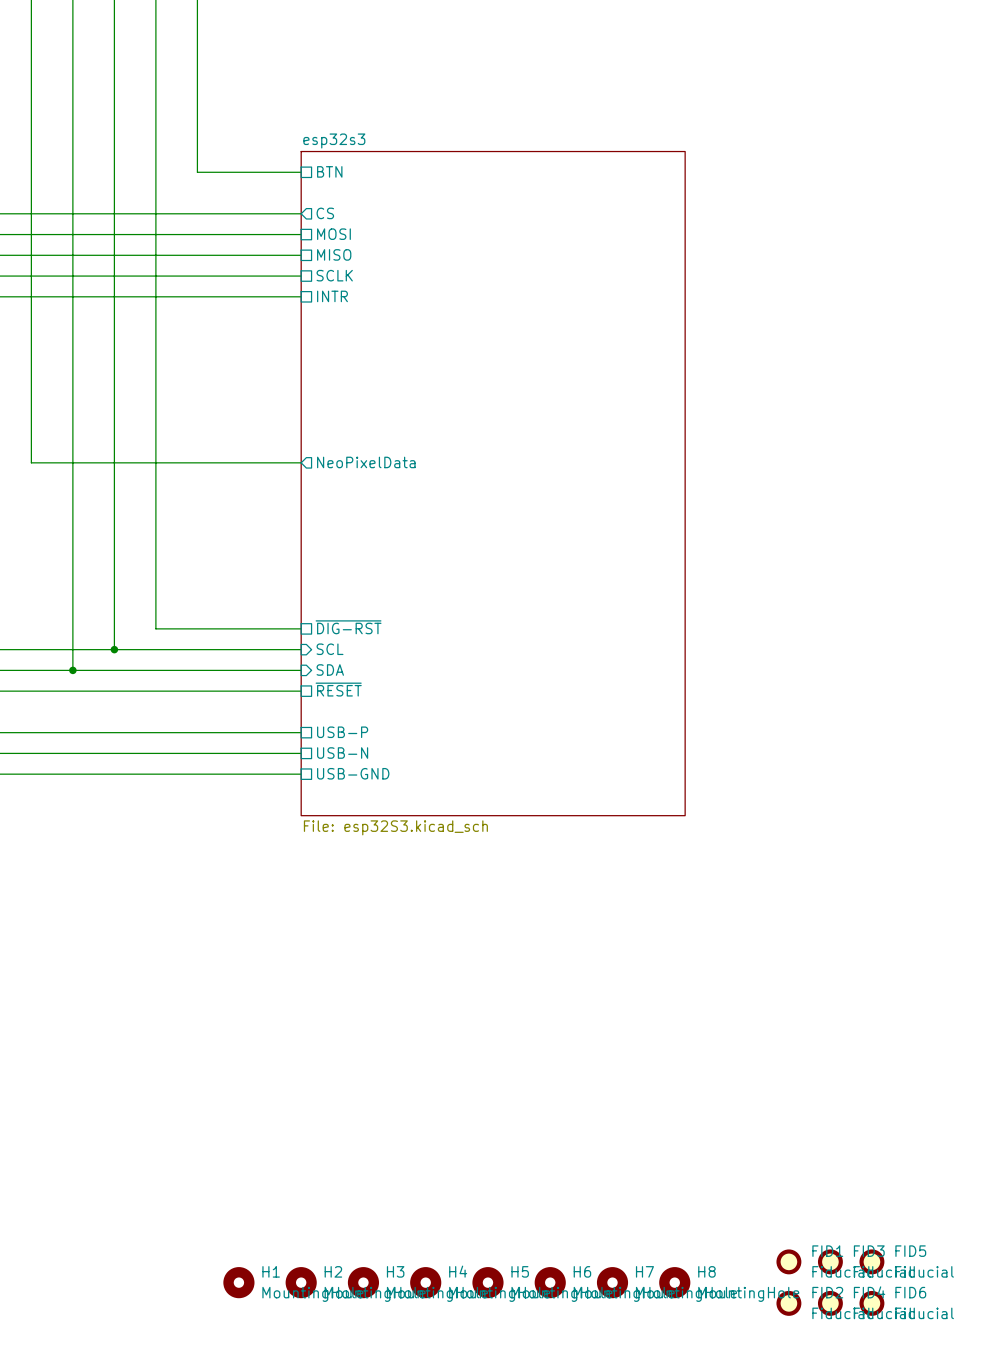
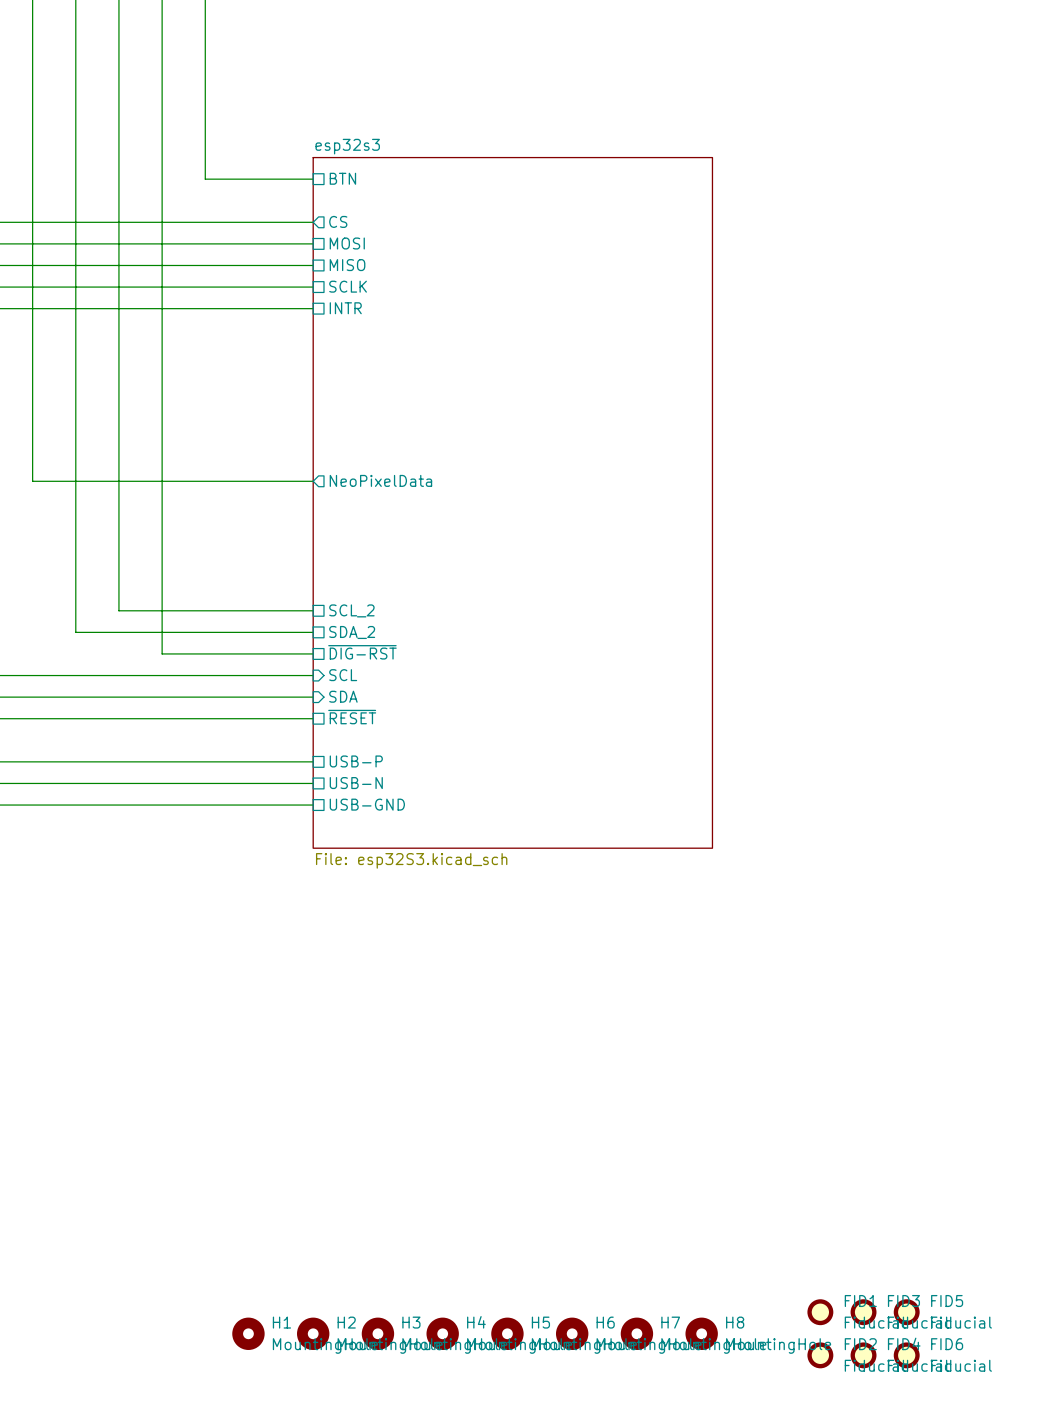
wire: (114, 587) (114, 649) -> (118, 610) (313, 610)
sheet pin: none -> SCL_2 (351, 610)
wire: (72, 608) (72, 670) -> (75, 632) (313, 632)
sheet pin: none -> SDA_2 (352, 632)
junction: (114, 649) -> none
junction: (72, 670) -> none

